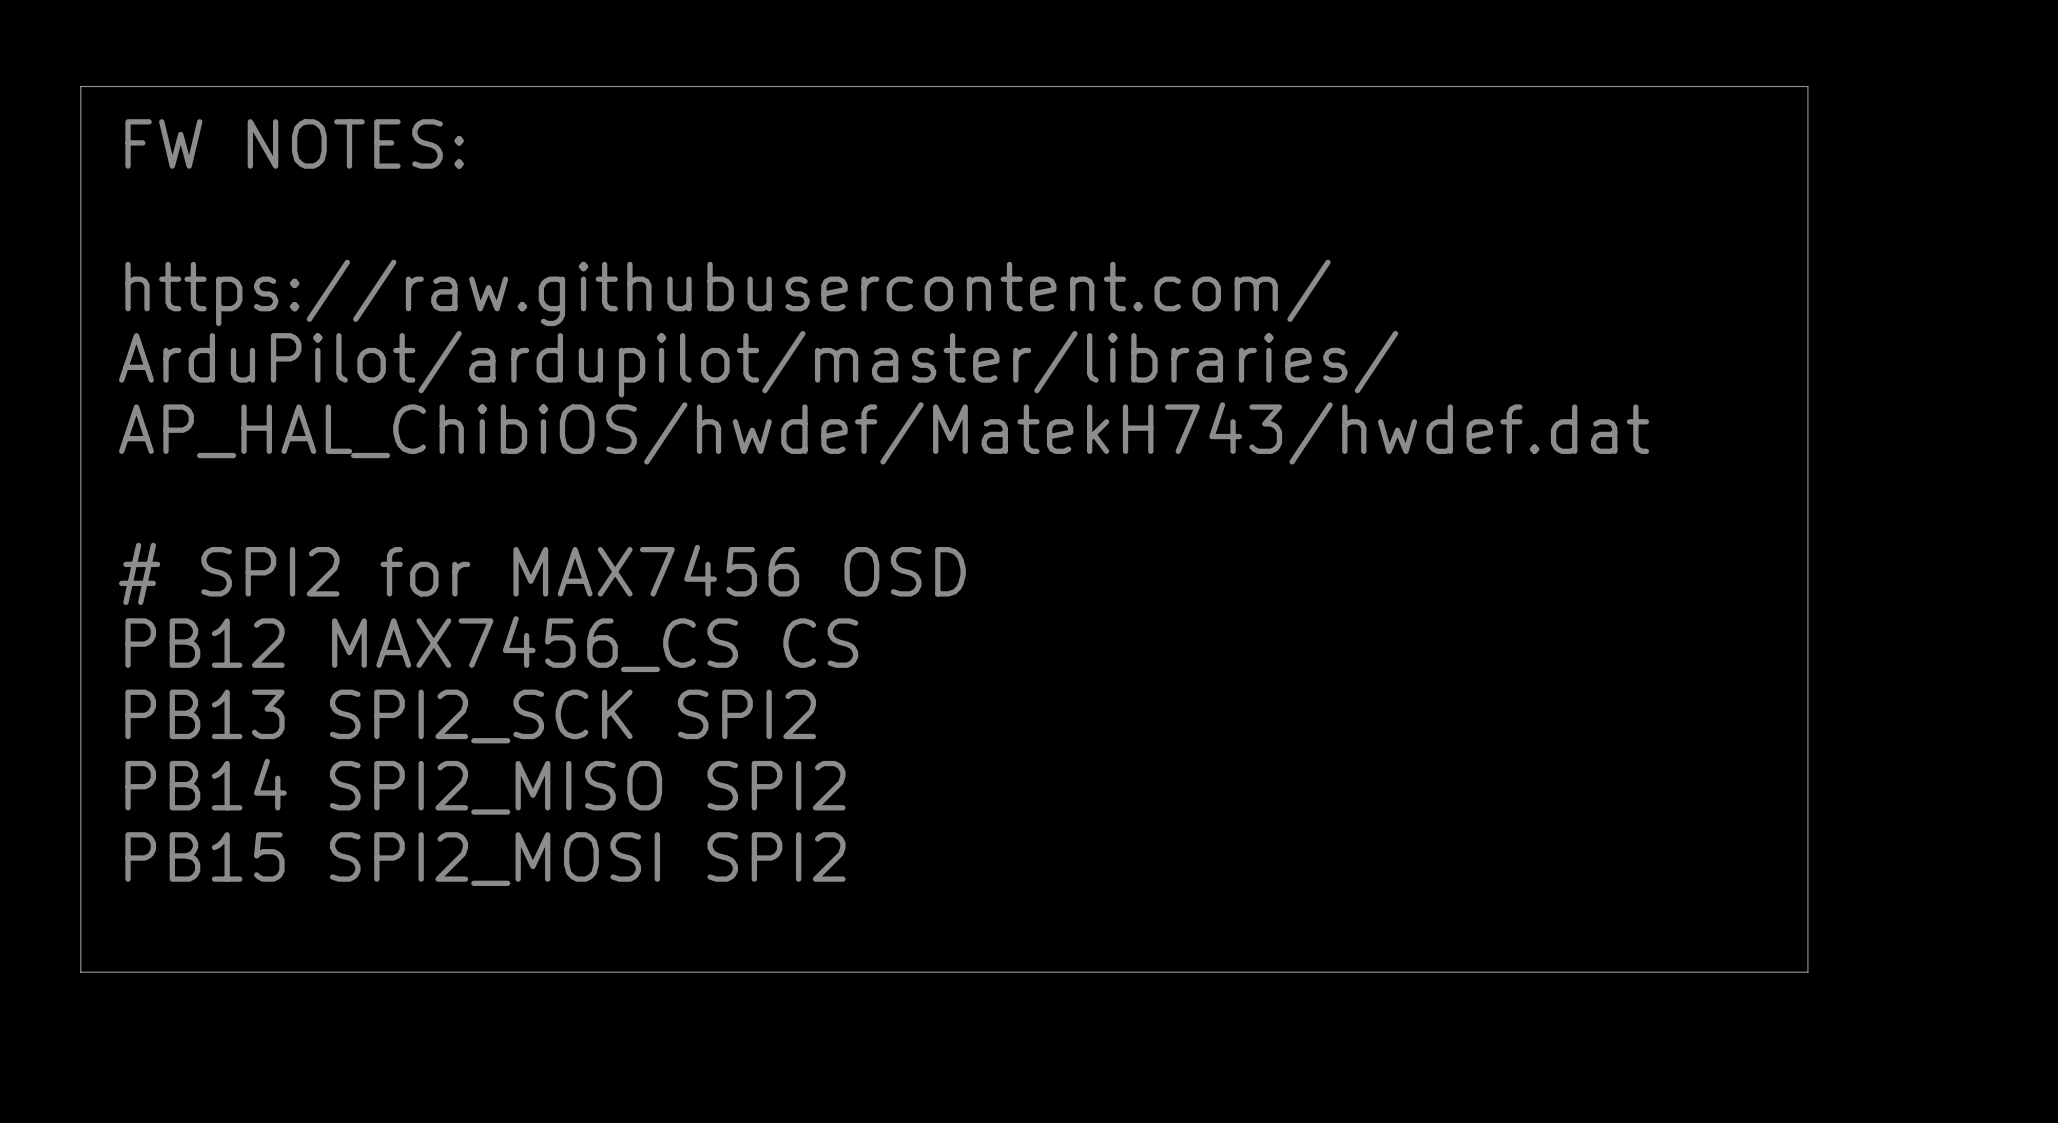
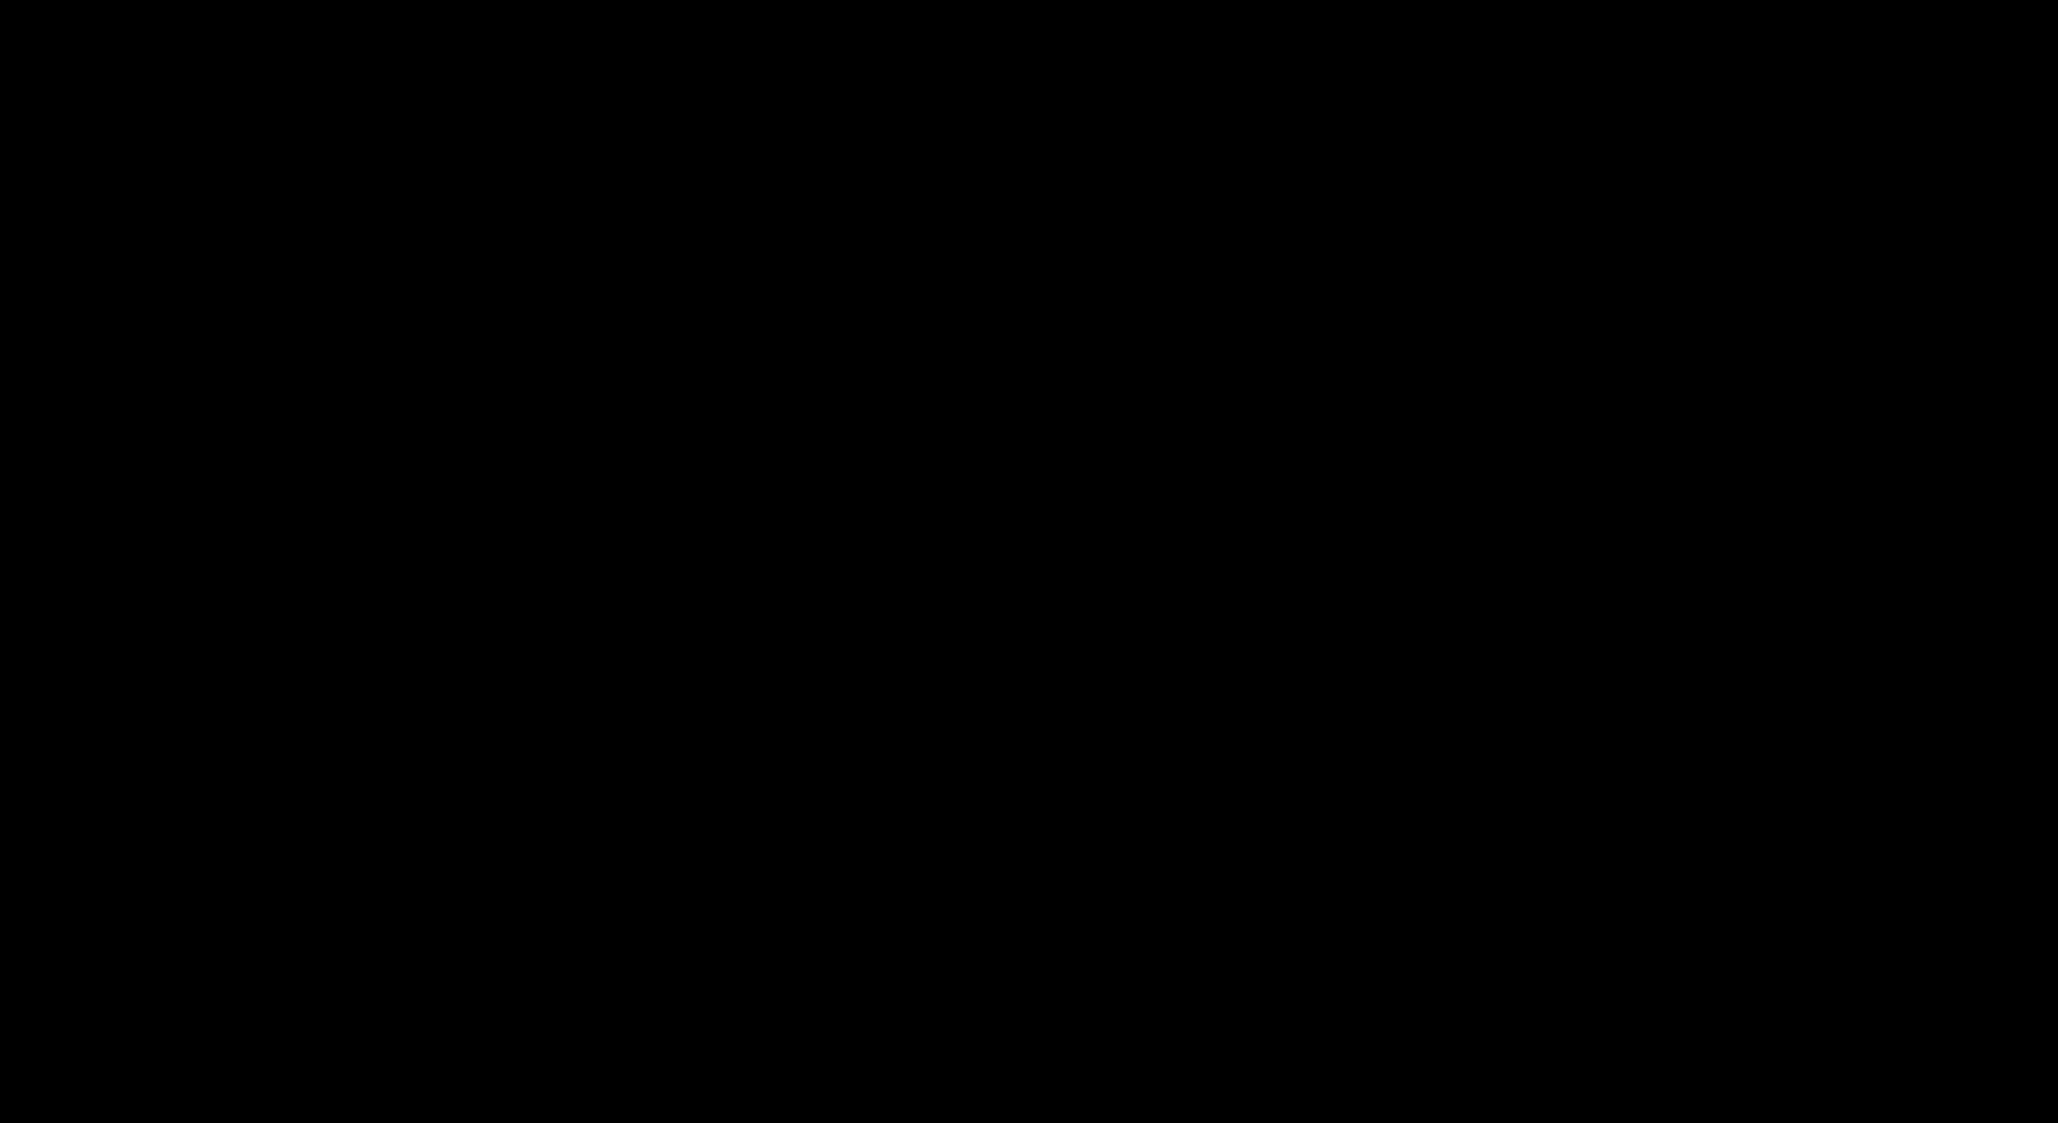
line: (80, 86) (1807, 86) (1807, 972) (80, 972) (80, 86) -> none
text: FW NOTES: (294, 143) -> none
text: https://raw.githubusercontent.com/ (727, 292) -> none
text: ArduPilot/ardupilot/master/libraries/ (758, 364) -> none
text: AP_HAL_ChibiOS/hwdef/MatekH743/hwdef.dat (884, 433) -> none
text: # SPI2 for MAX7456 OSD (542, 573) -> none
text: PB12 MAX7456_CS CS (491, 644) -> none
text: PB13 SPI2_SCK SPI2 (470, 716) -> none
text: PB14 SPI2_MISO SPI2 (485, 786) -> none
text: PB15 SPI2_MOSI SPI2 (485, 859) -> none

